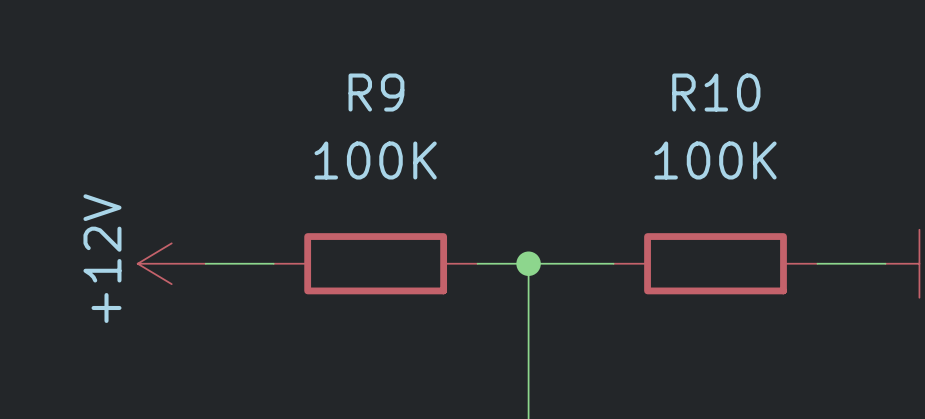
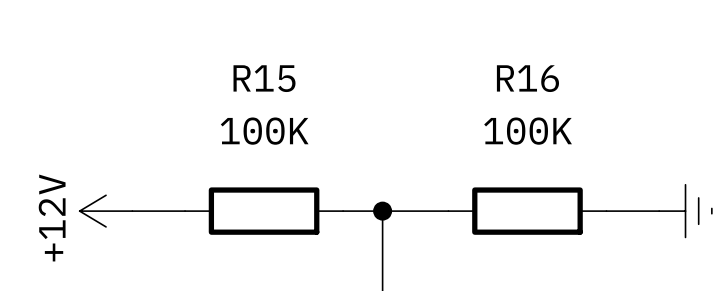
R9 name: R9 (376, 92) -> R15 (264, 78)
R10 name: R10 (716, 92) -> R16 (527, 78)

